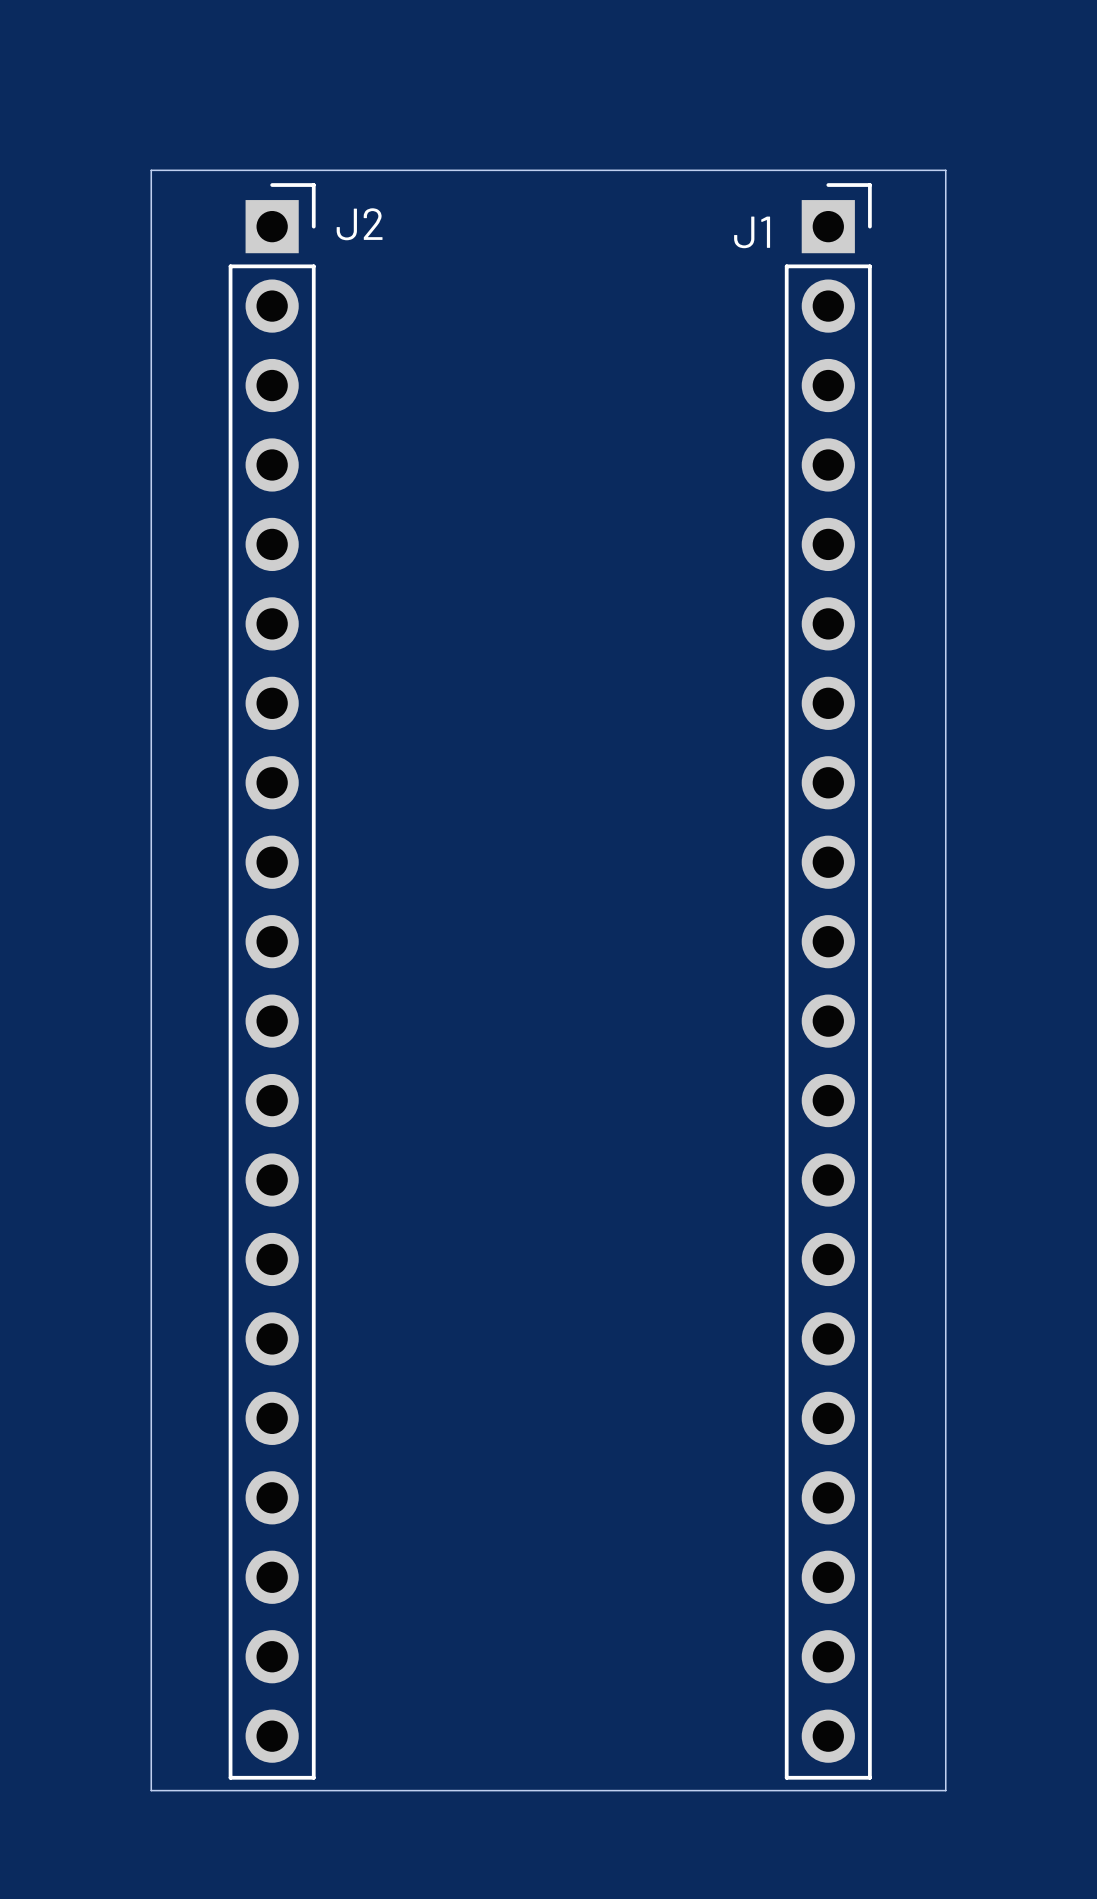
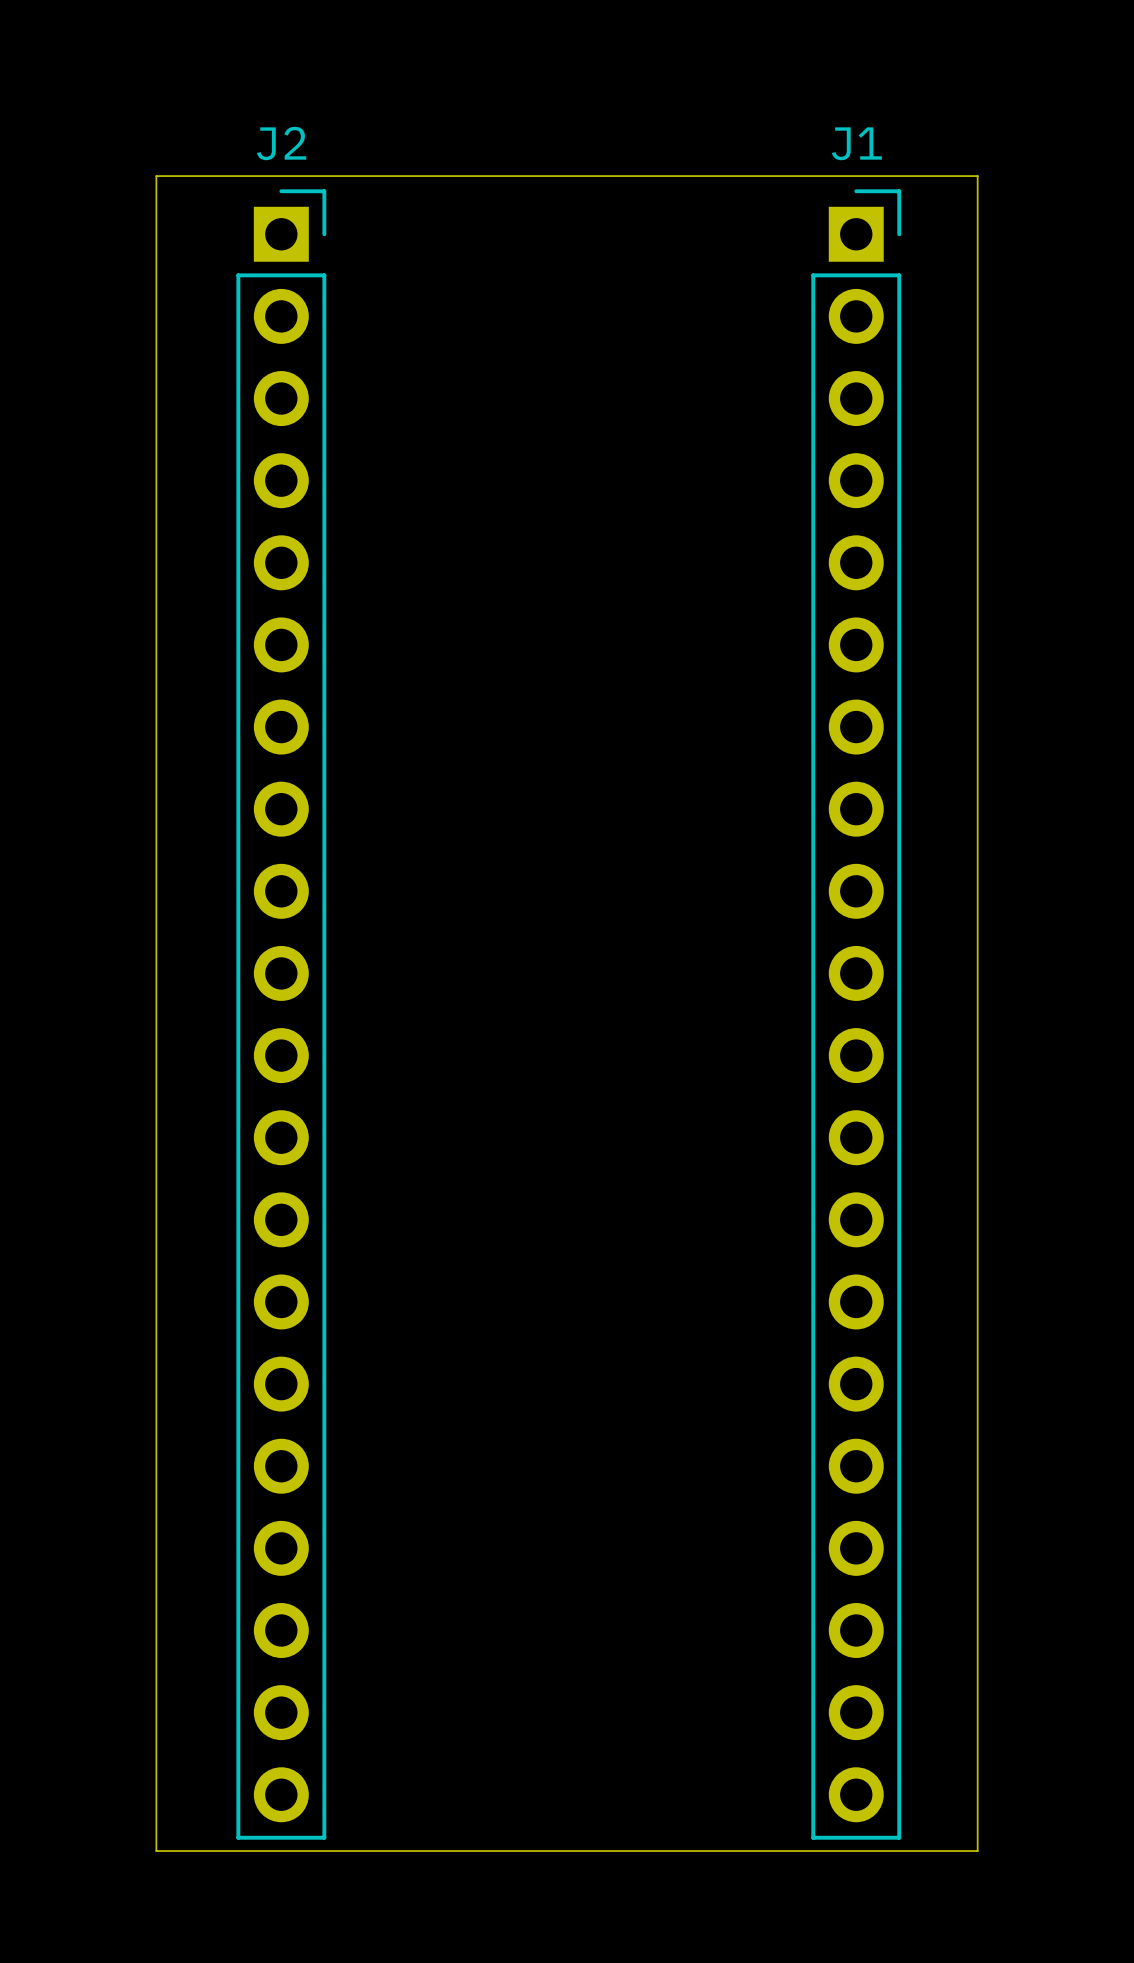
J2 name position: J2 (359, 224) -> J2 (281, 143)
J1 name position: J1 (752, 232) -> J1 (856, 143)

